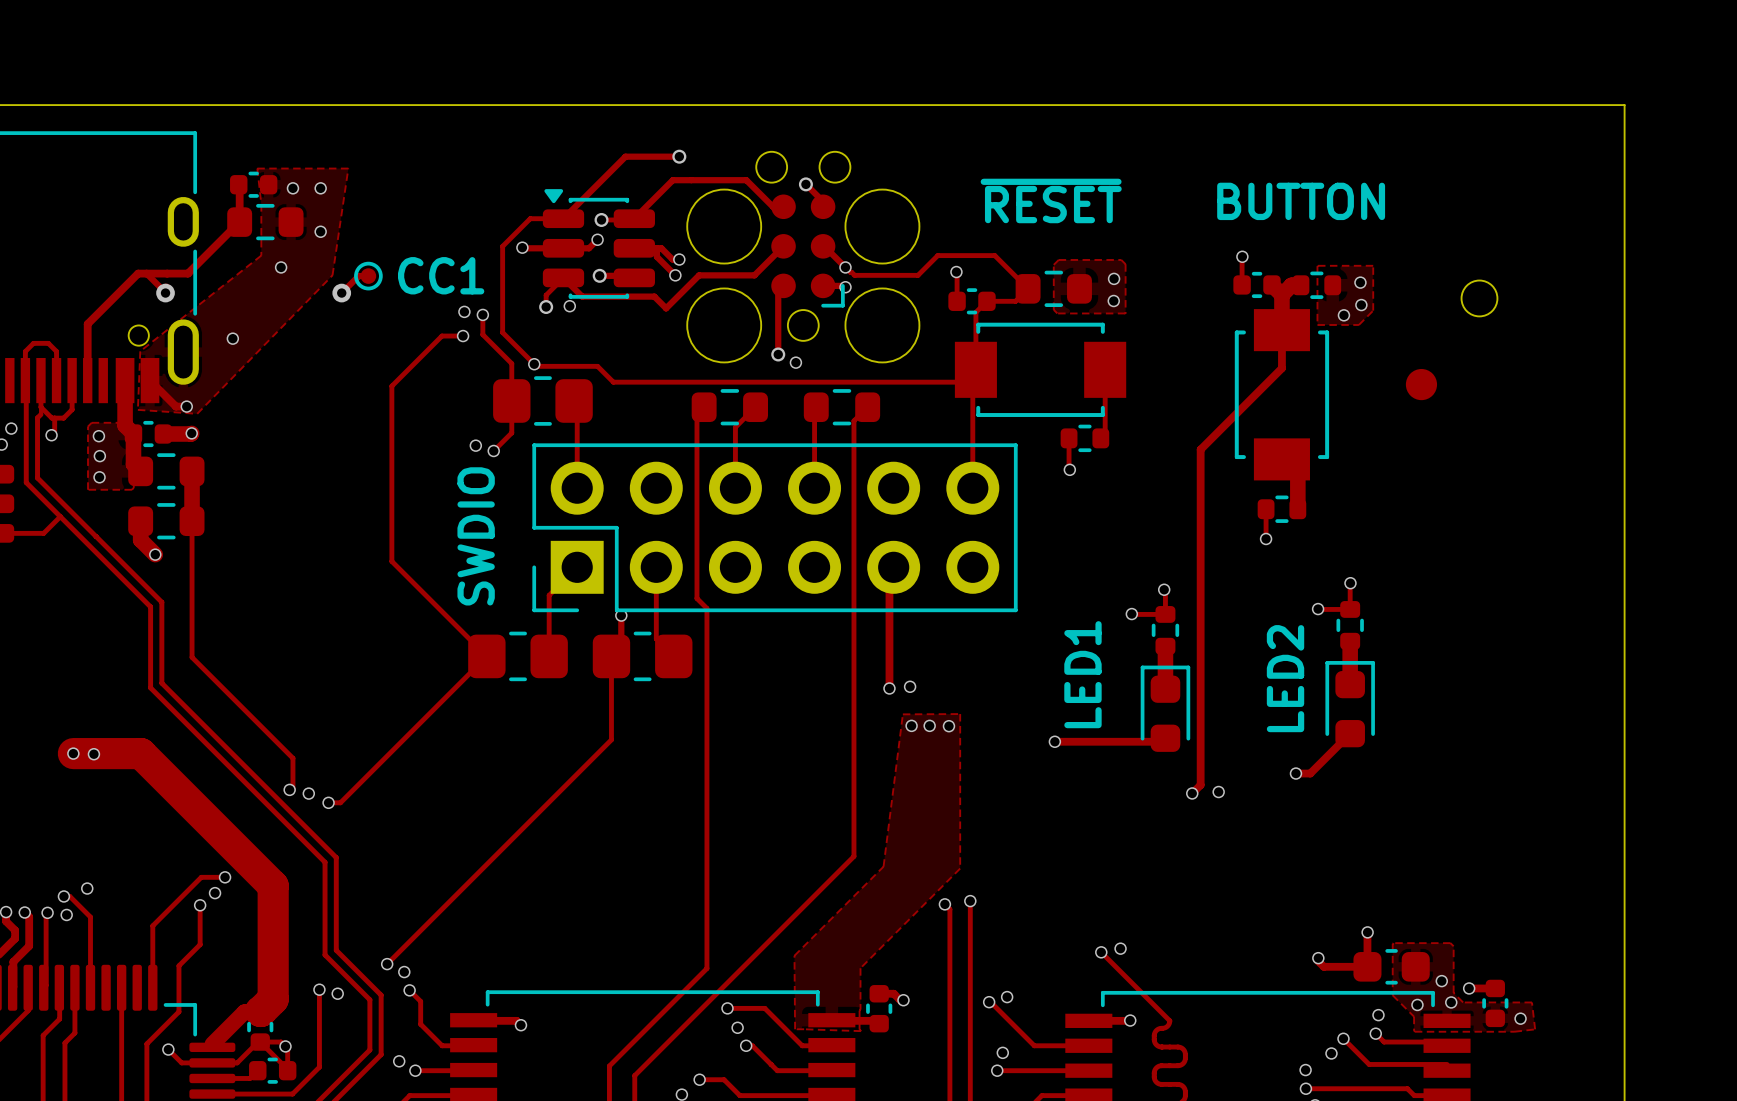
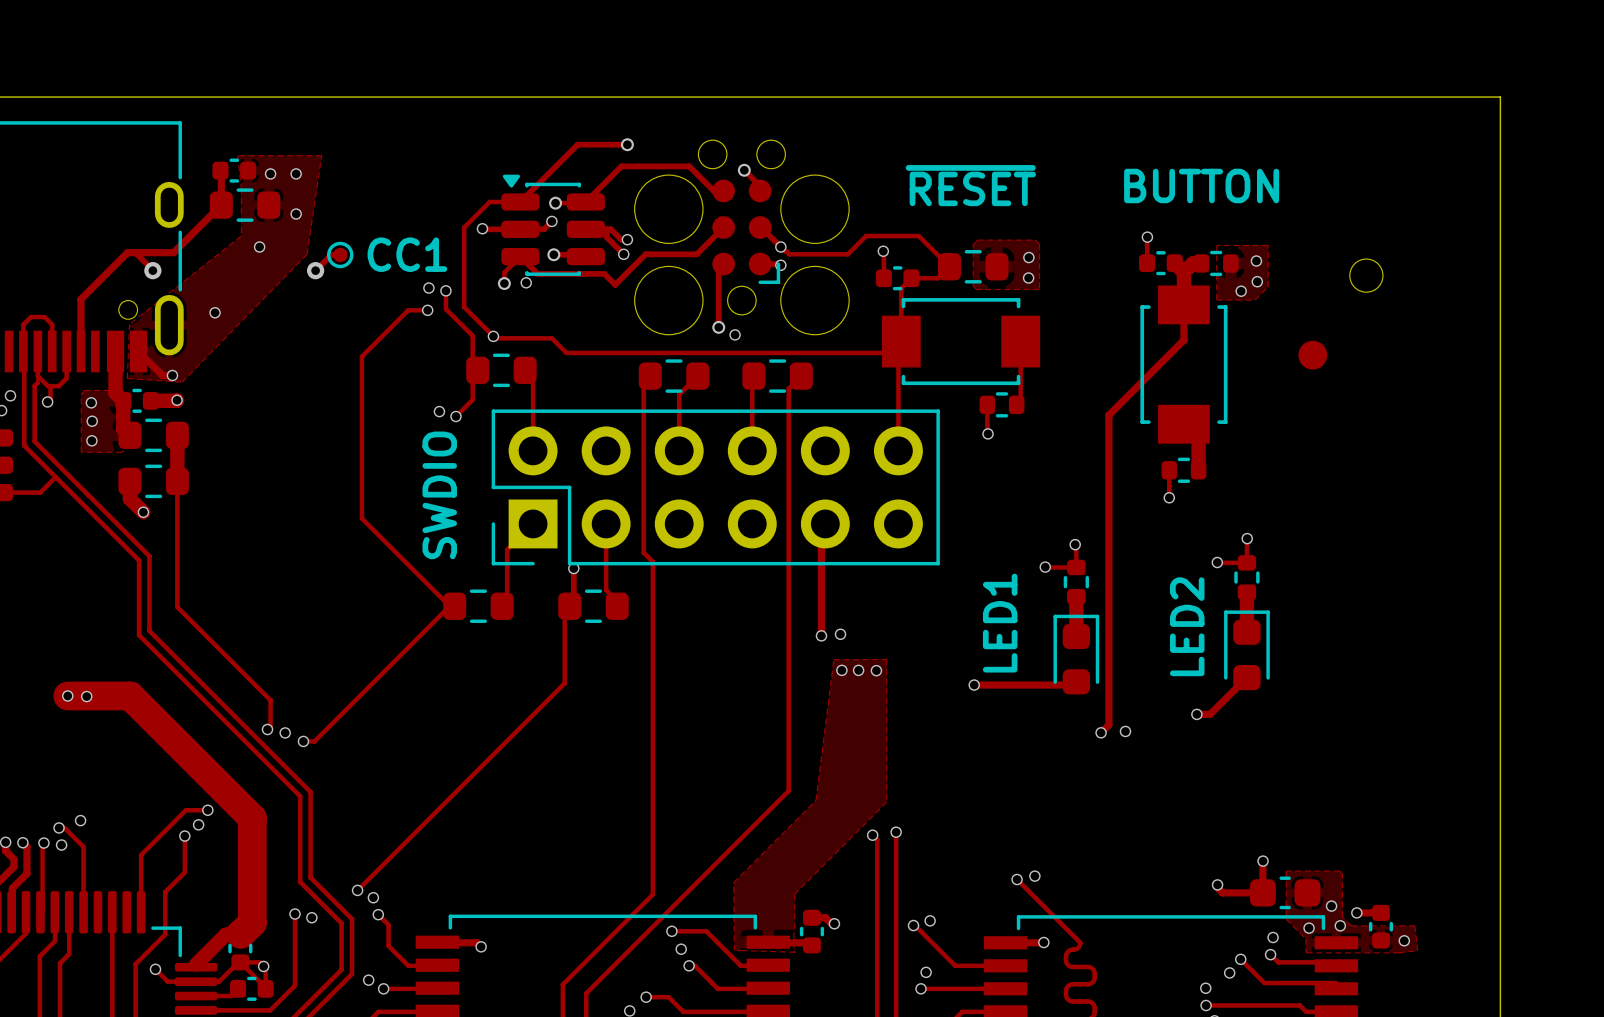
part footprint: [493, 376, 593, 426] -> [466, 353, 537, 388]
part footprint: [468, 631, 568, 682] -> [443, 589, 514, 623]
part footprint: [592, 631, 693, 682] -> [558, 589, 629, 623]

